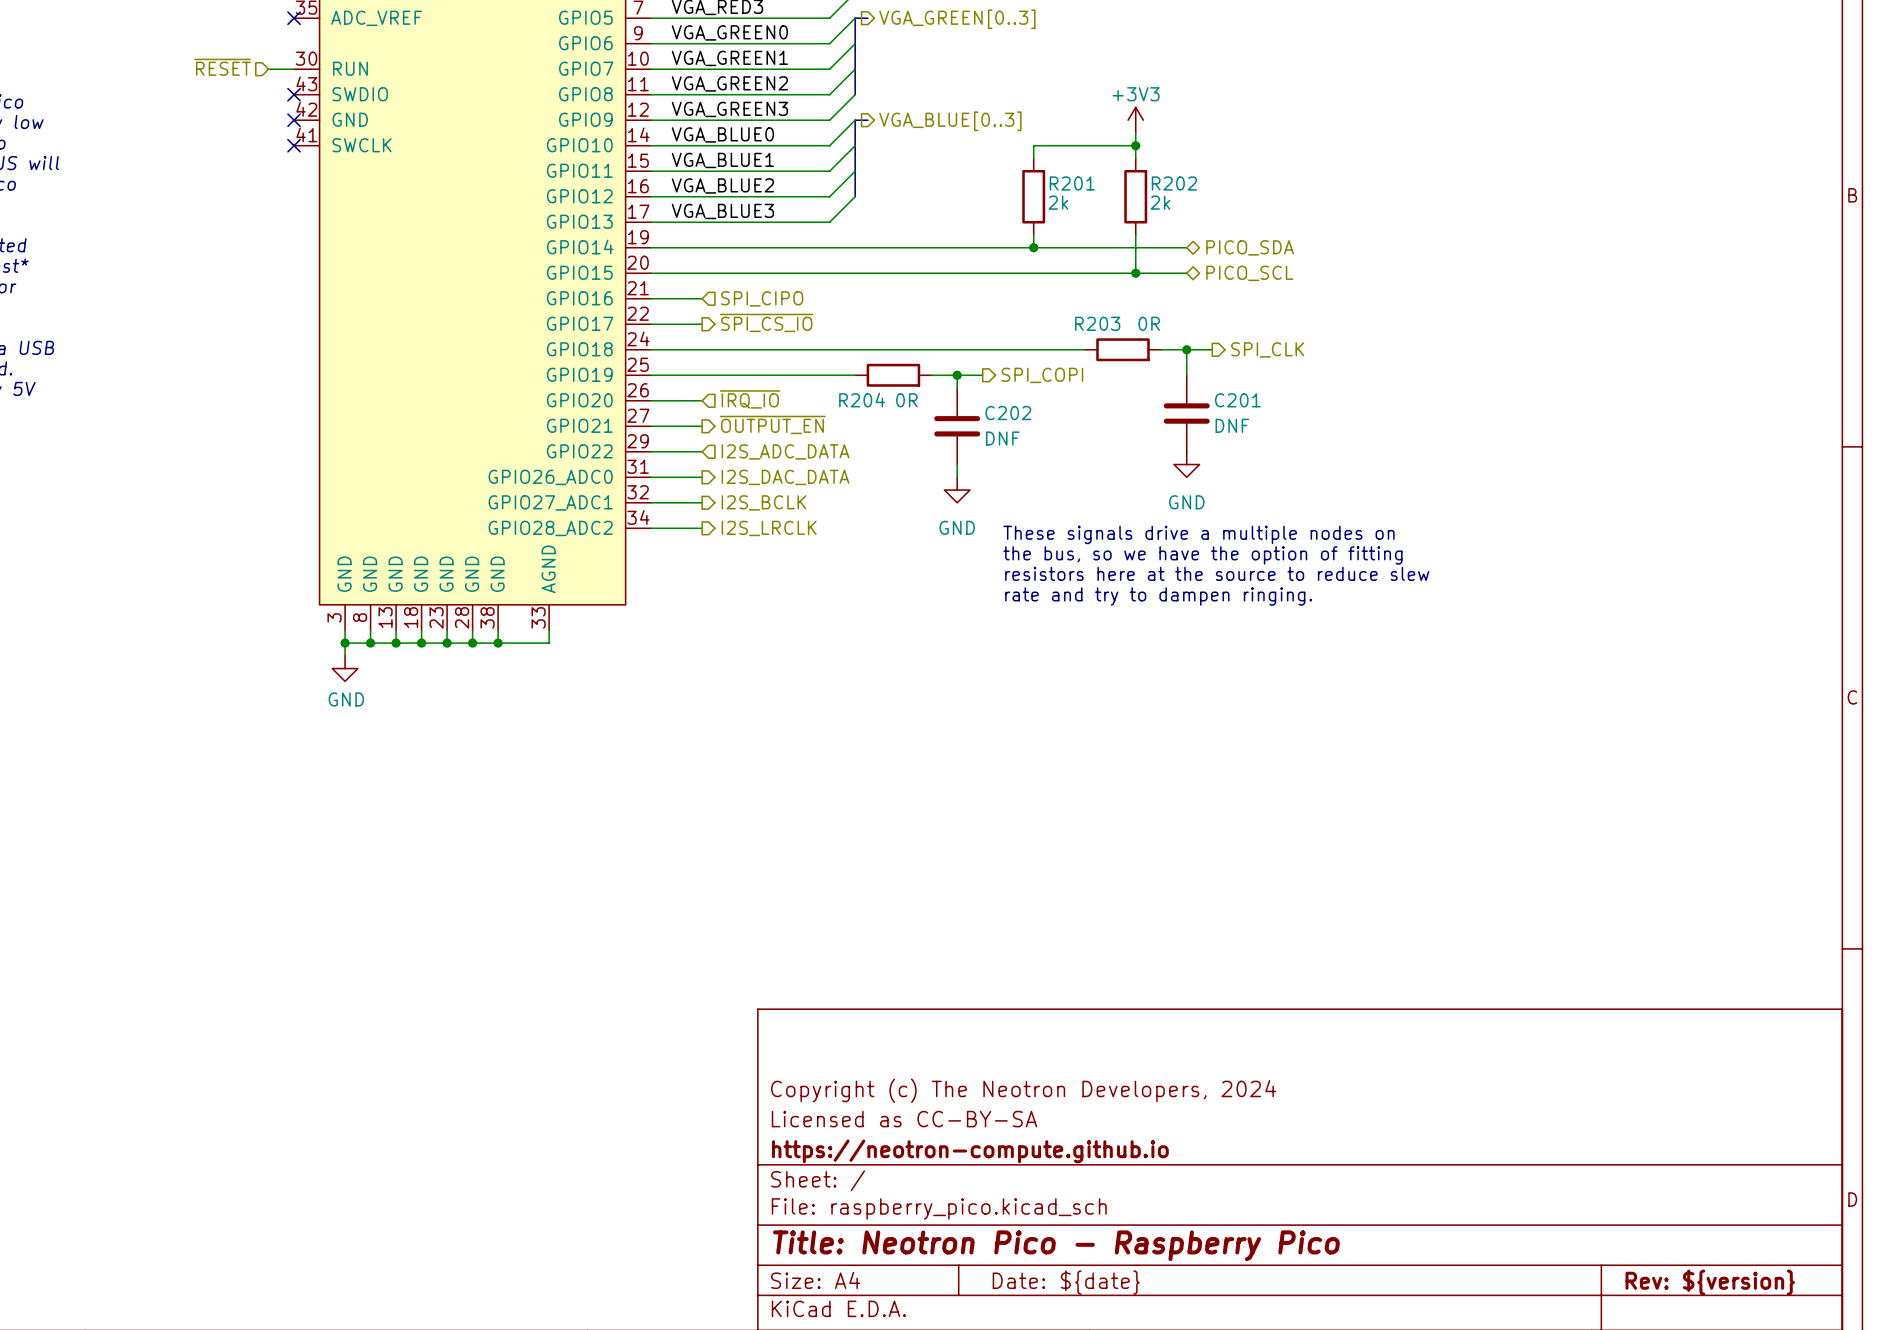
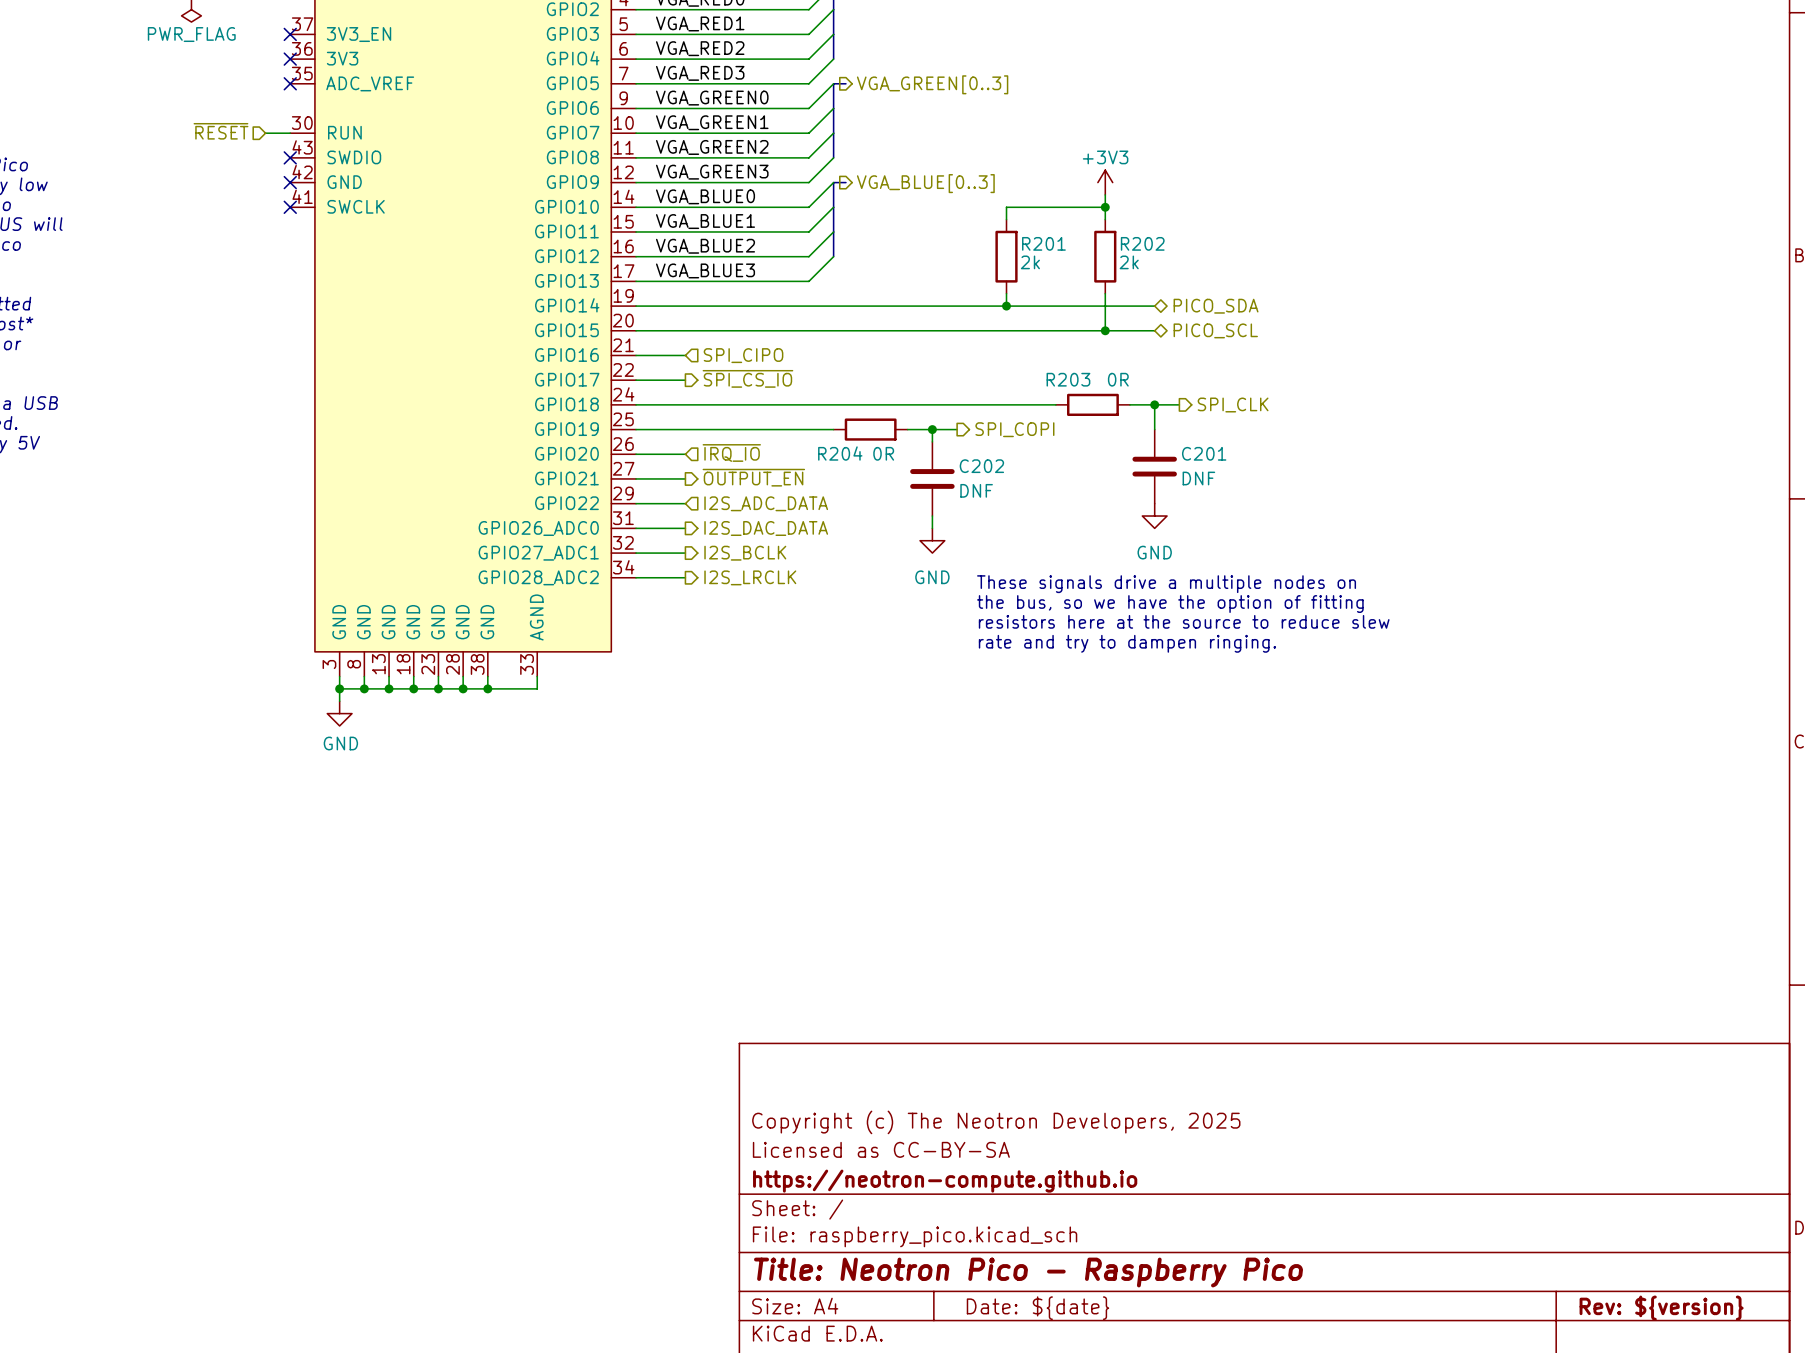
title block: Copyright (c) The Neotron Developers, 2024 (1023, 1090) -> Copyright (c) The Neotron Developers, 2025 (996, 1122)

